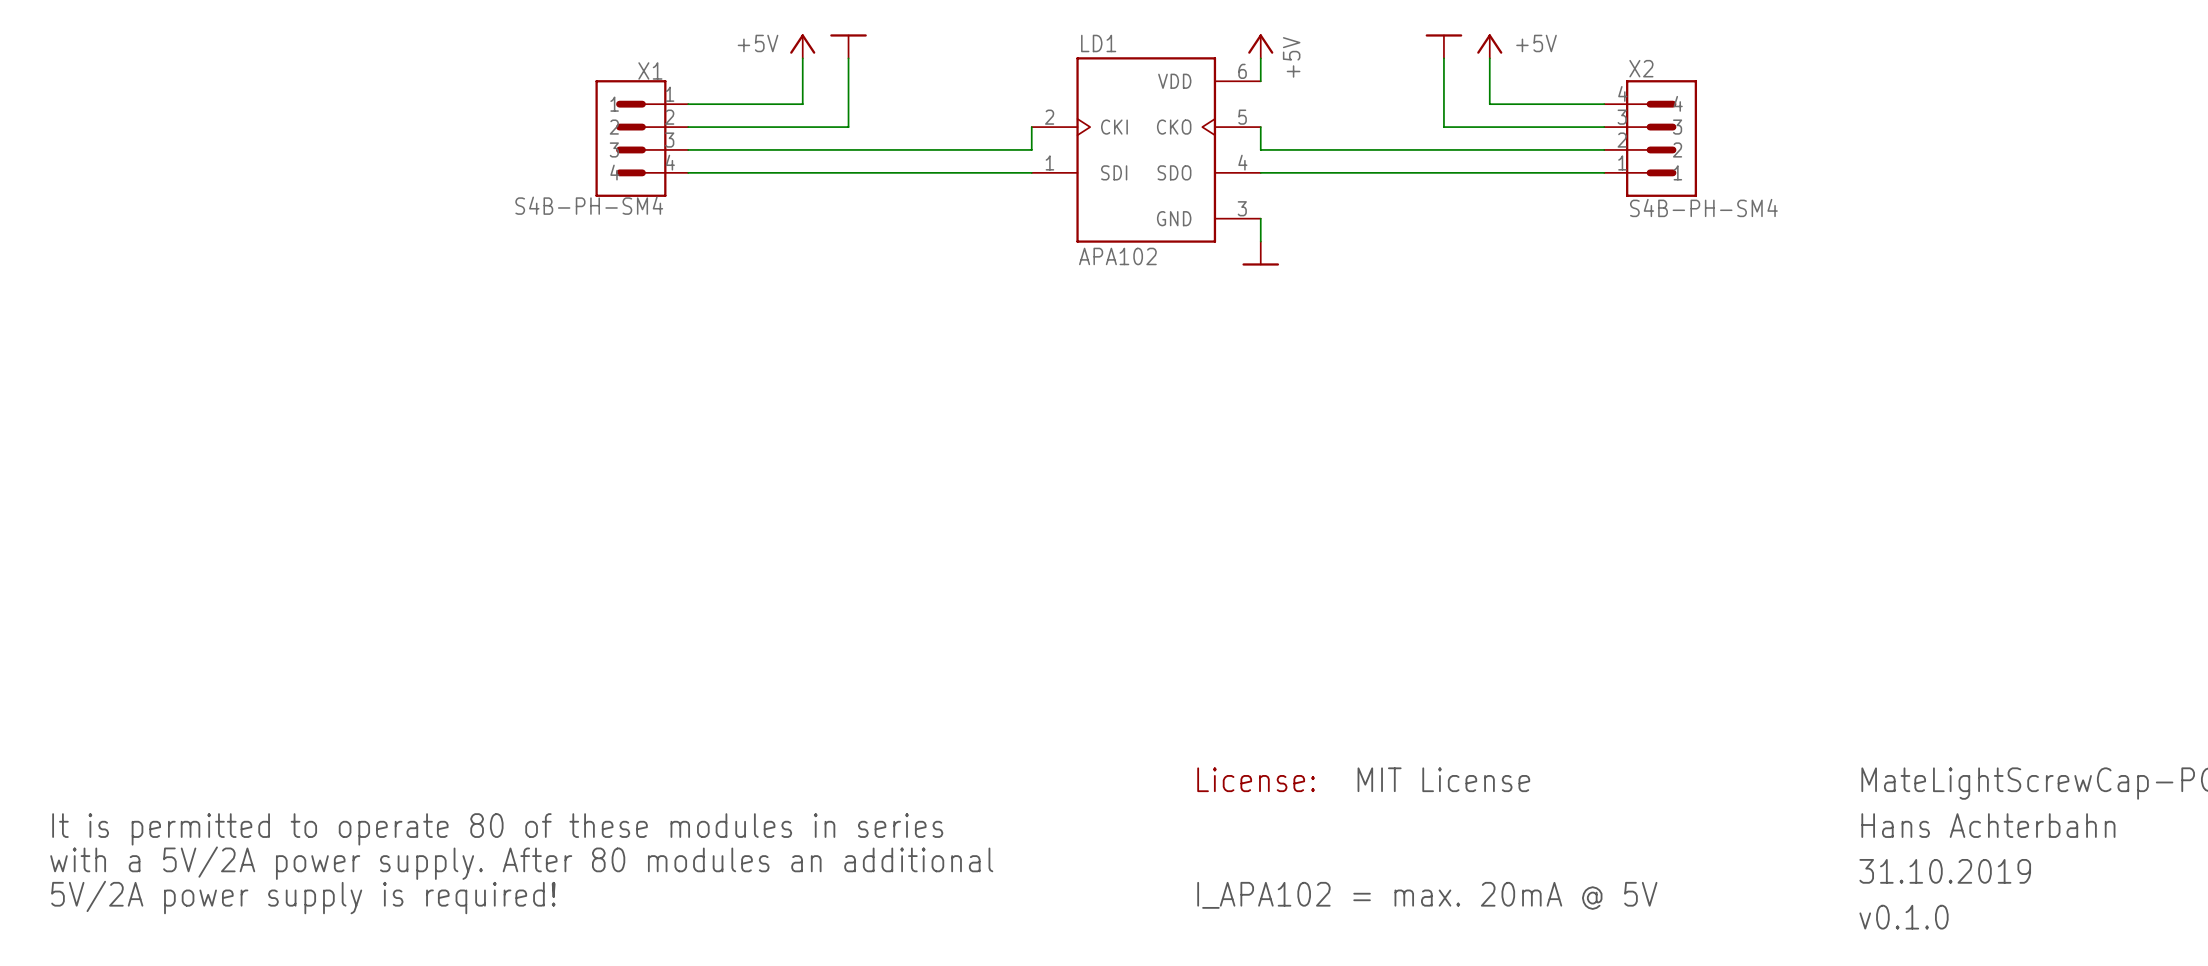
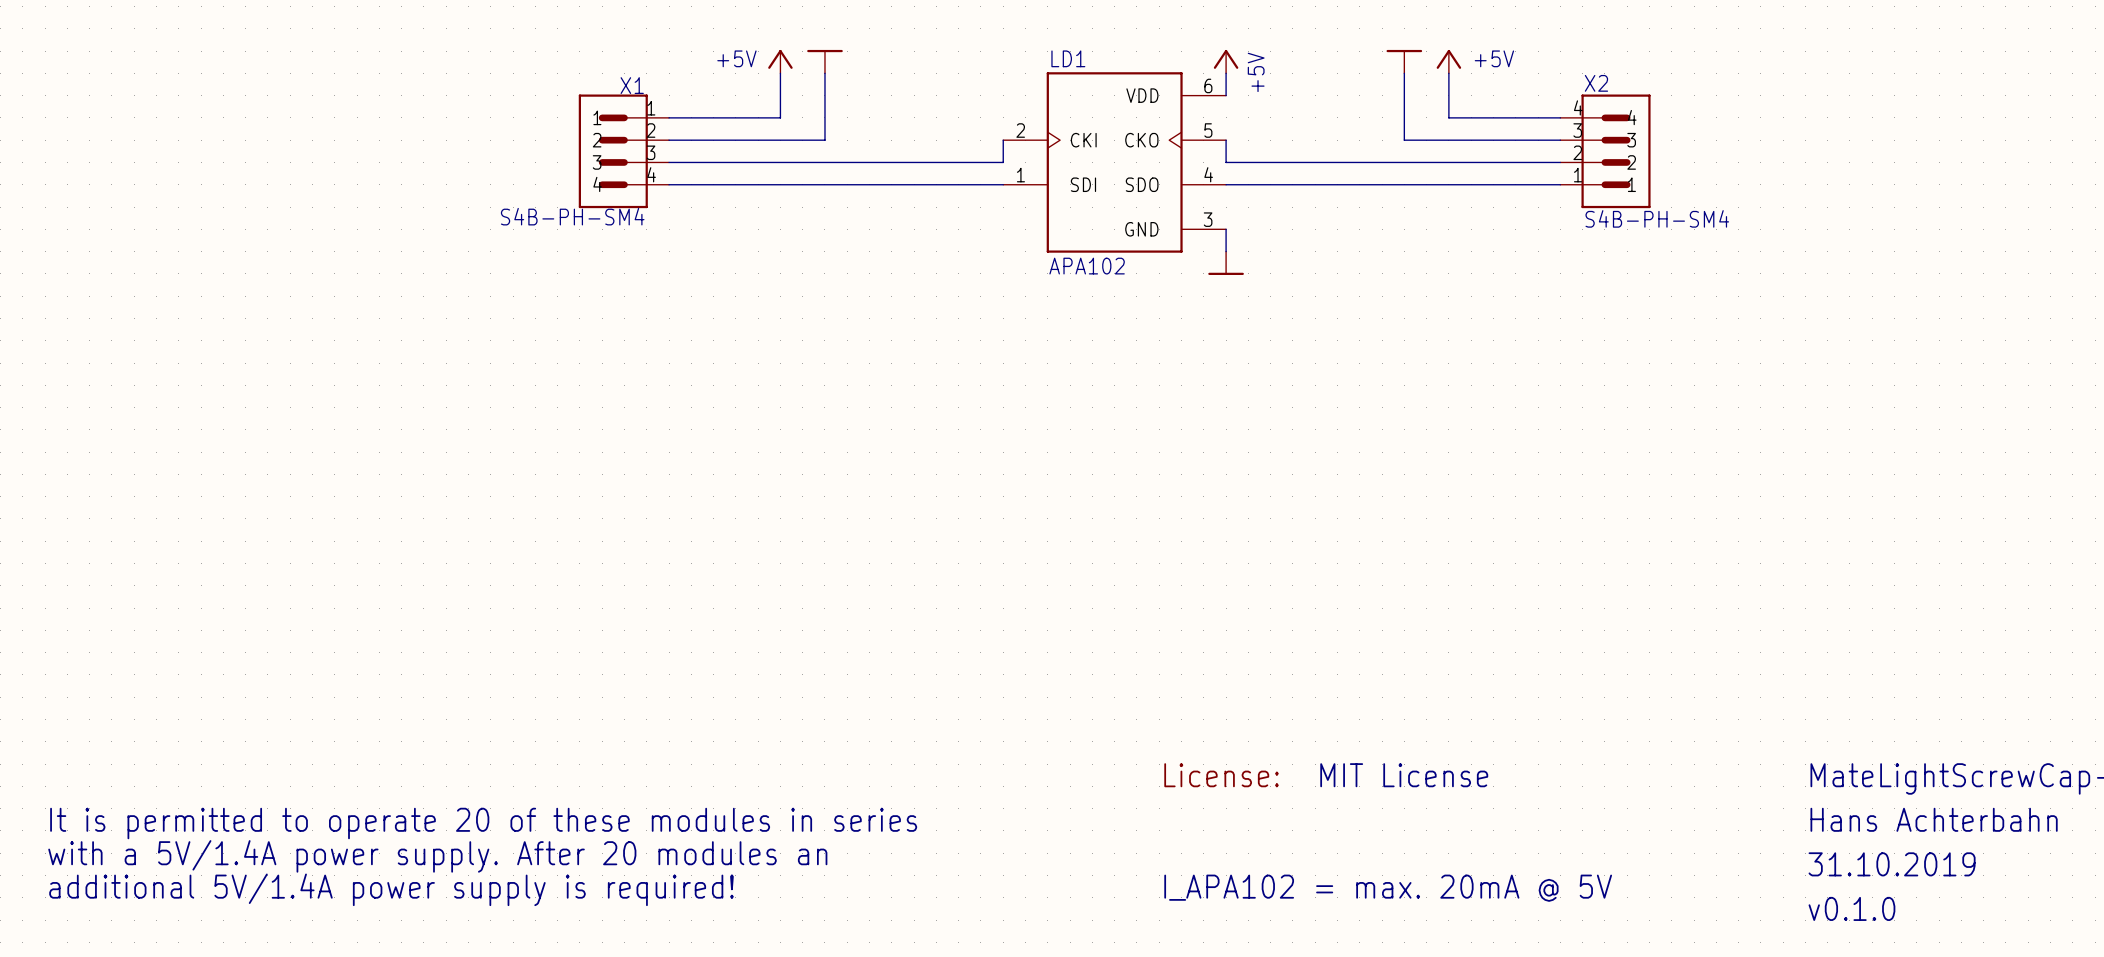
text: It is permitted to operate 80 of these modules in series (497, 829) -> It is permitted to operate 20 of these modules in series (483, 823)
text: with a 5V/2A power supply. After 80 modules an additional (521, 863) -> with a 5V/1.4A power supply. After 20 modules an (437, 856)
text: 5V/2A power supply is required! (303, 897) -> additional 5V/1.4A power supply is required! (391, 889)

